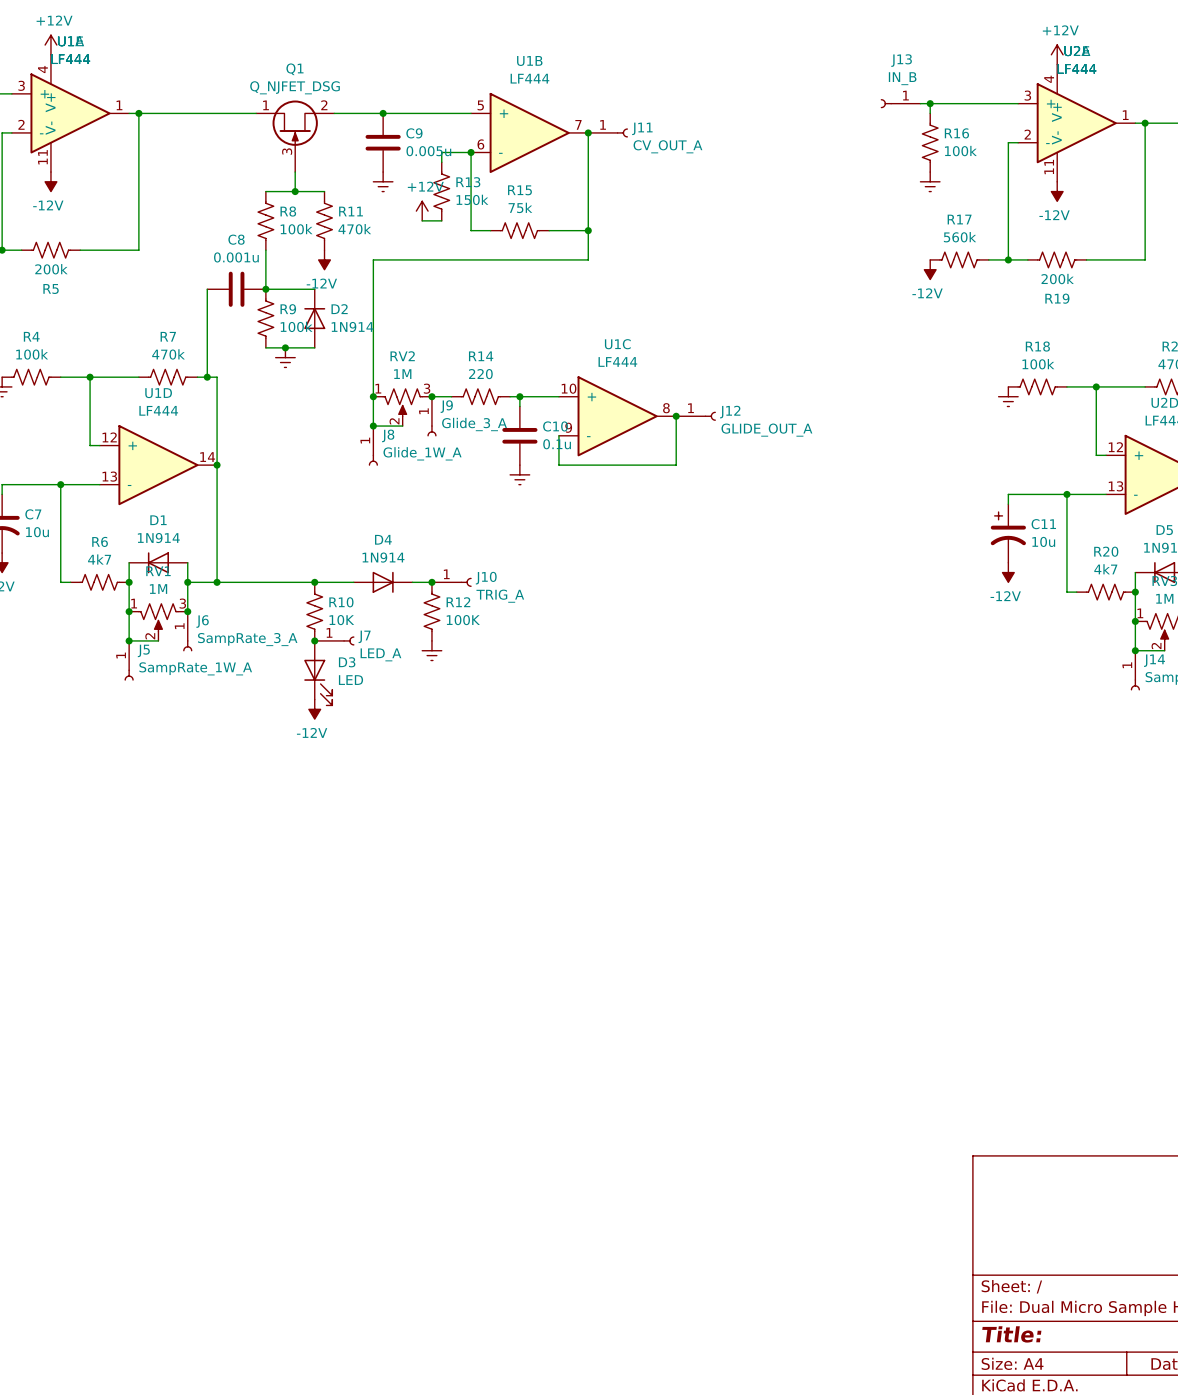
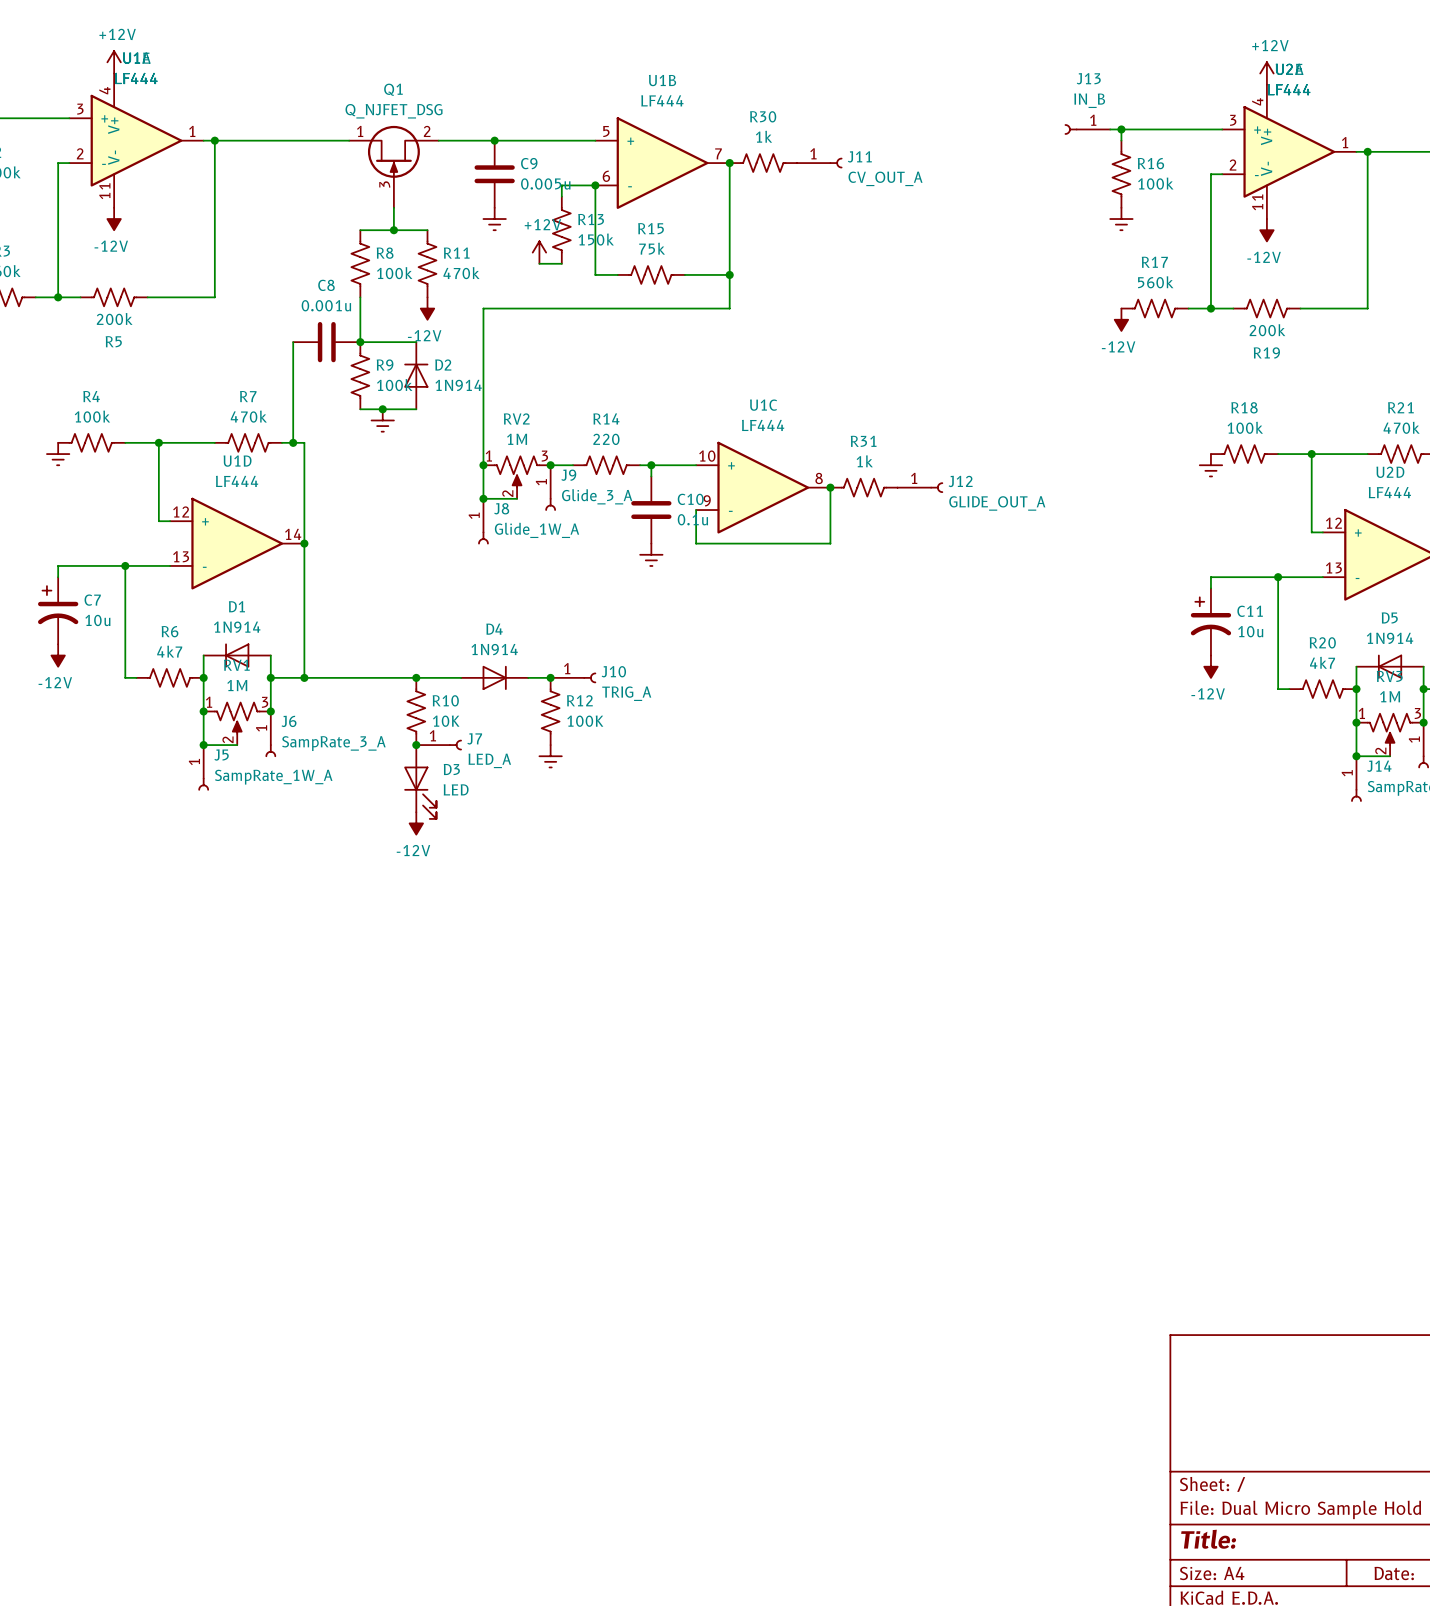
J11 position: (608, 132) -> (819, 163)
R30: none -> 1k (763, 163)
J12 position: (696, 416) -> (920, 487)
R31: none -> 1k (864, 487)

